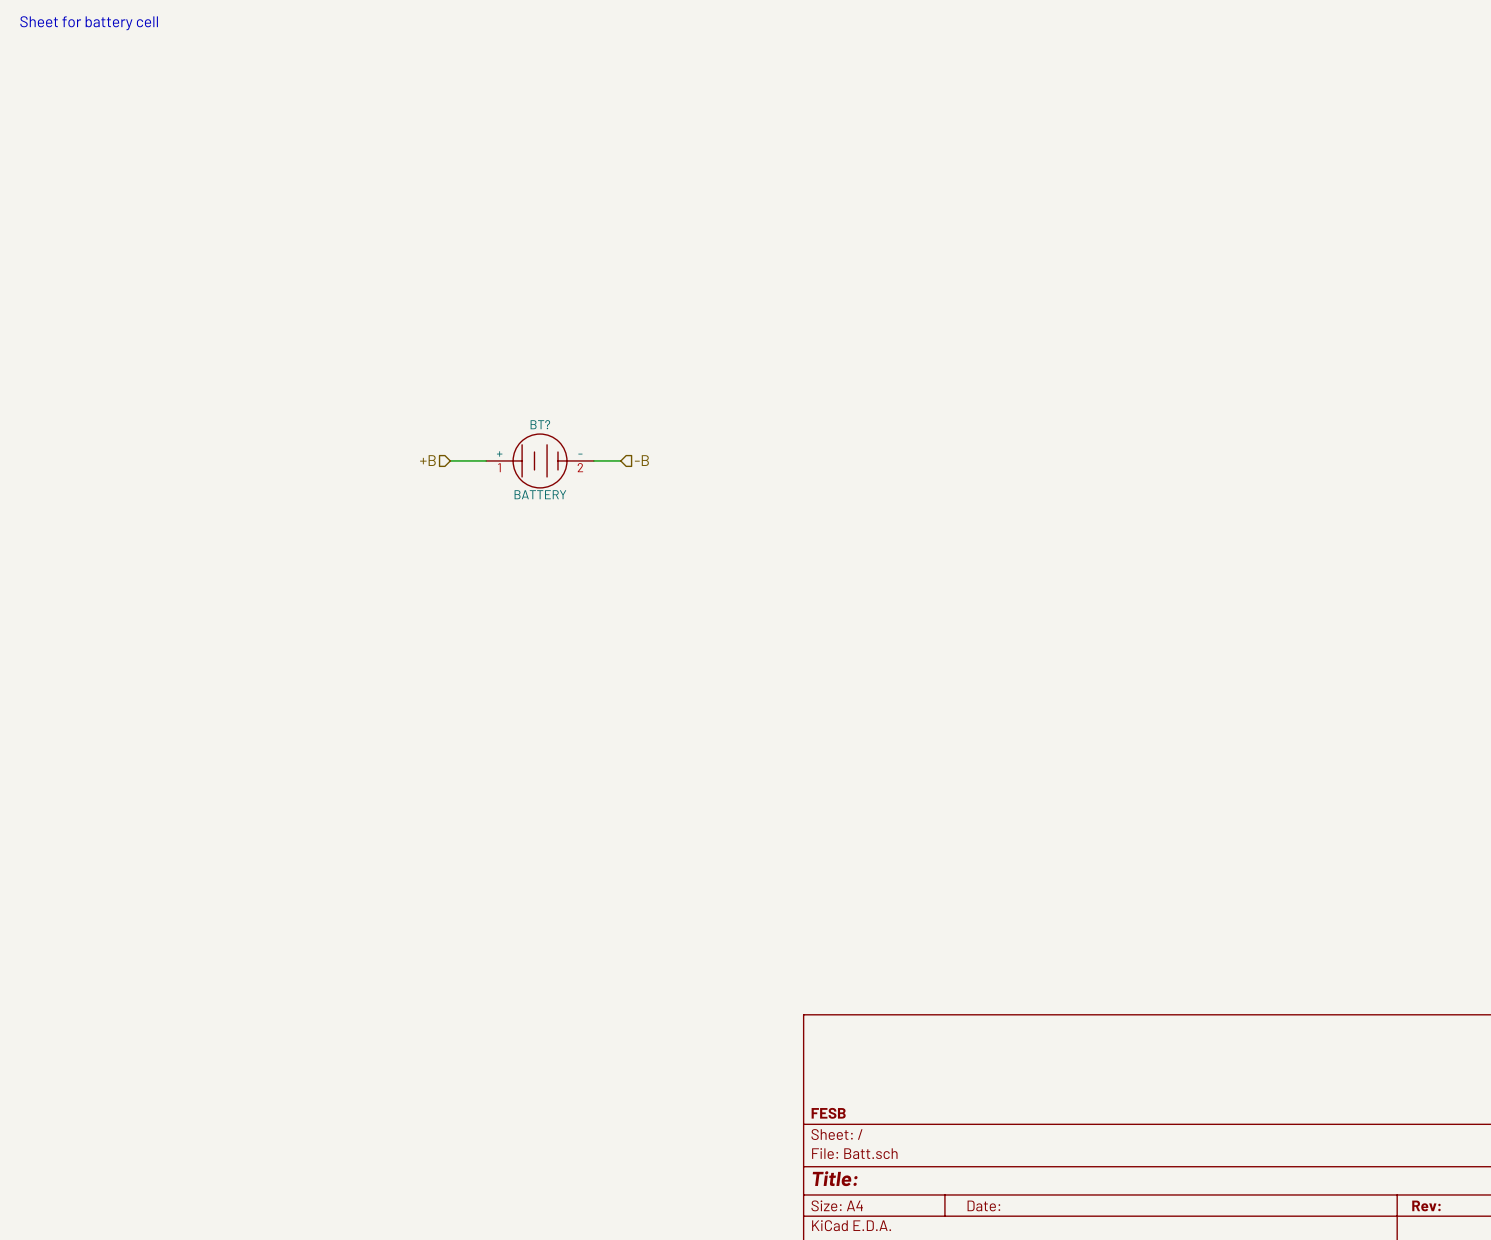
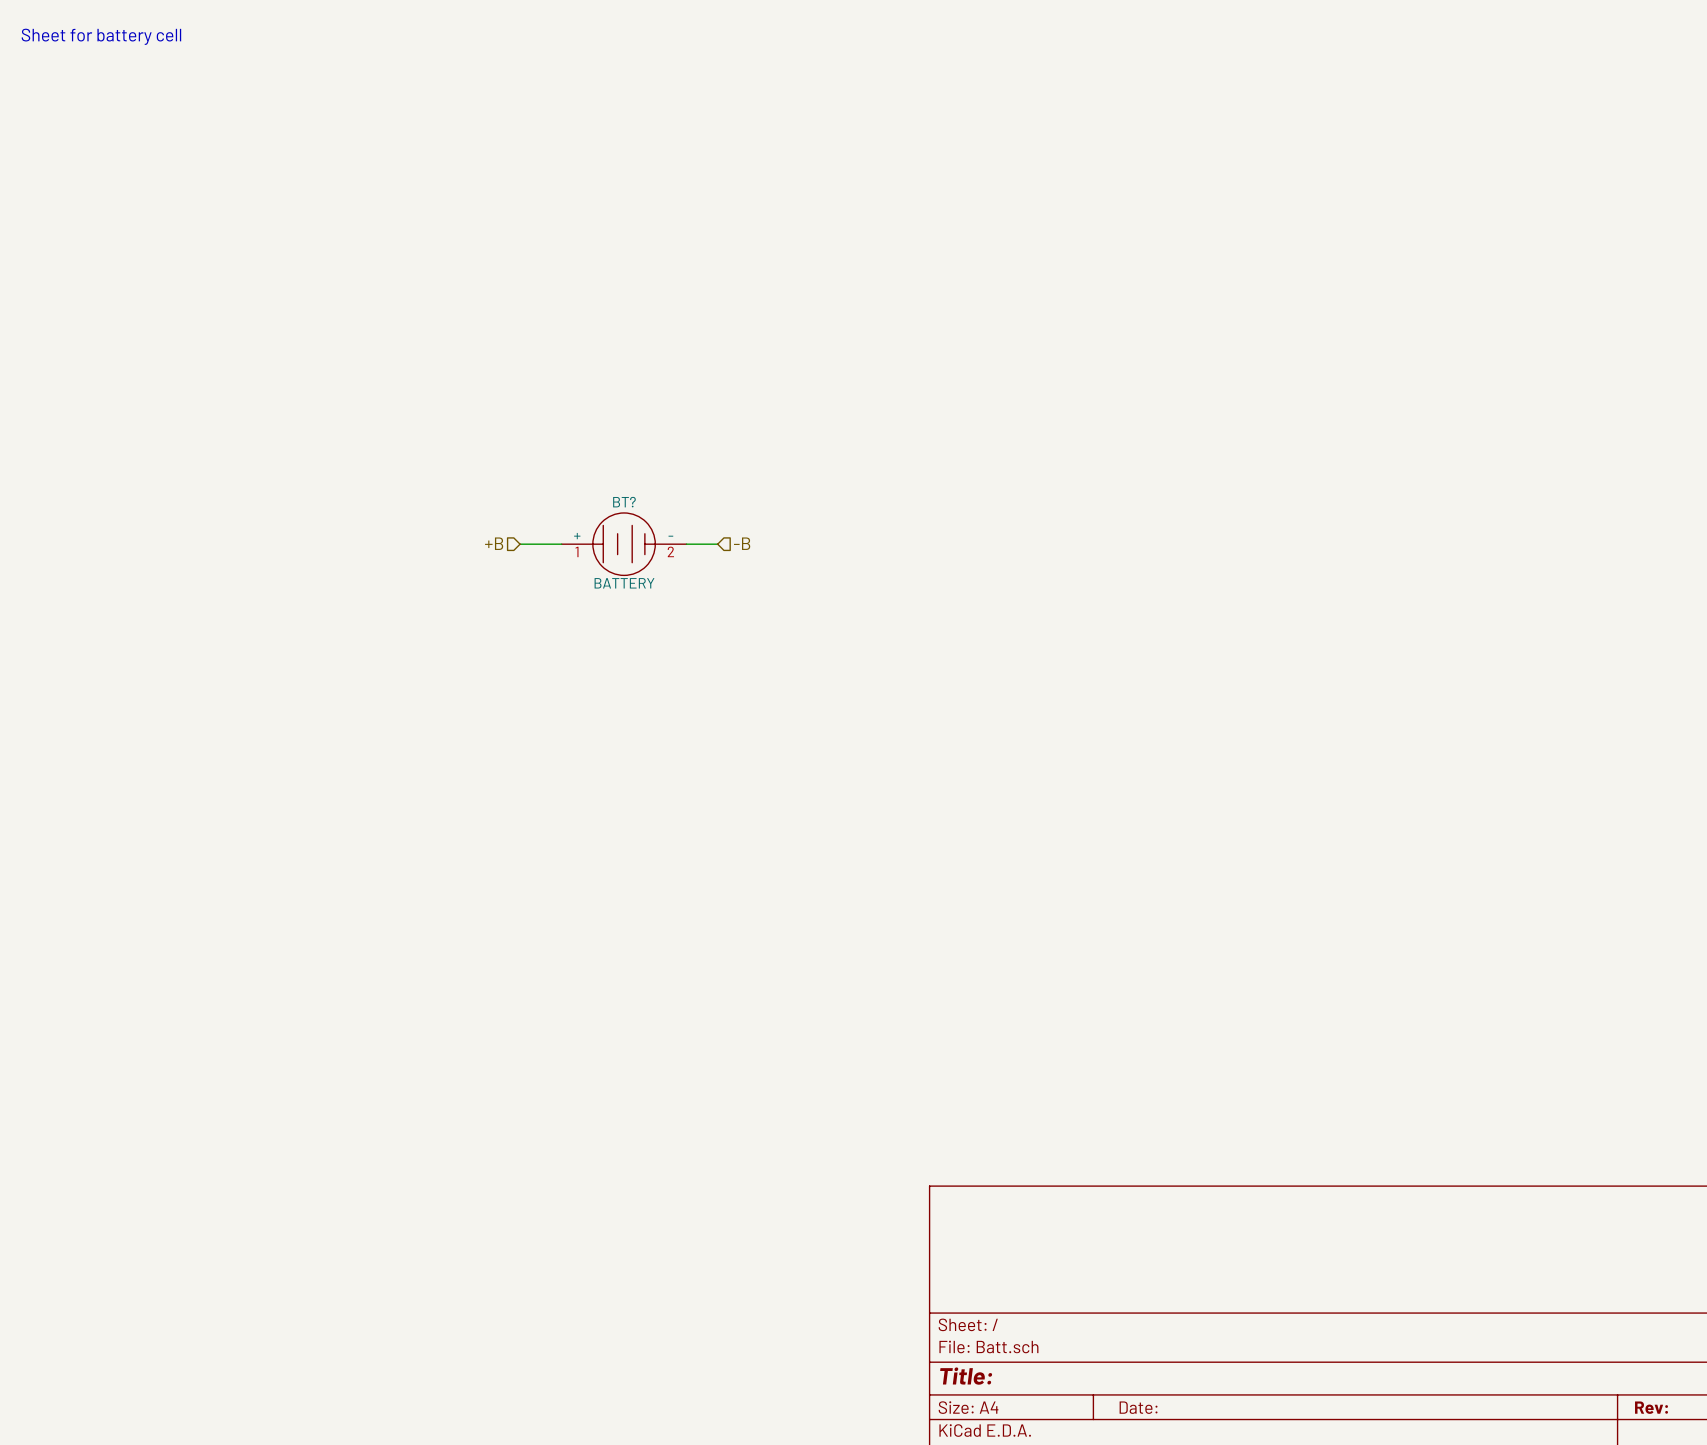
title block: FESB (828, 1113) -> none

